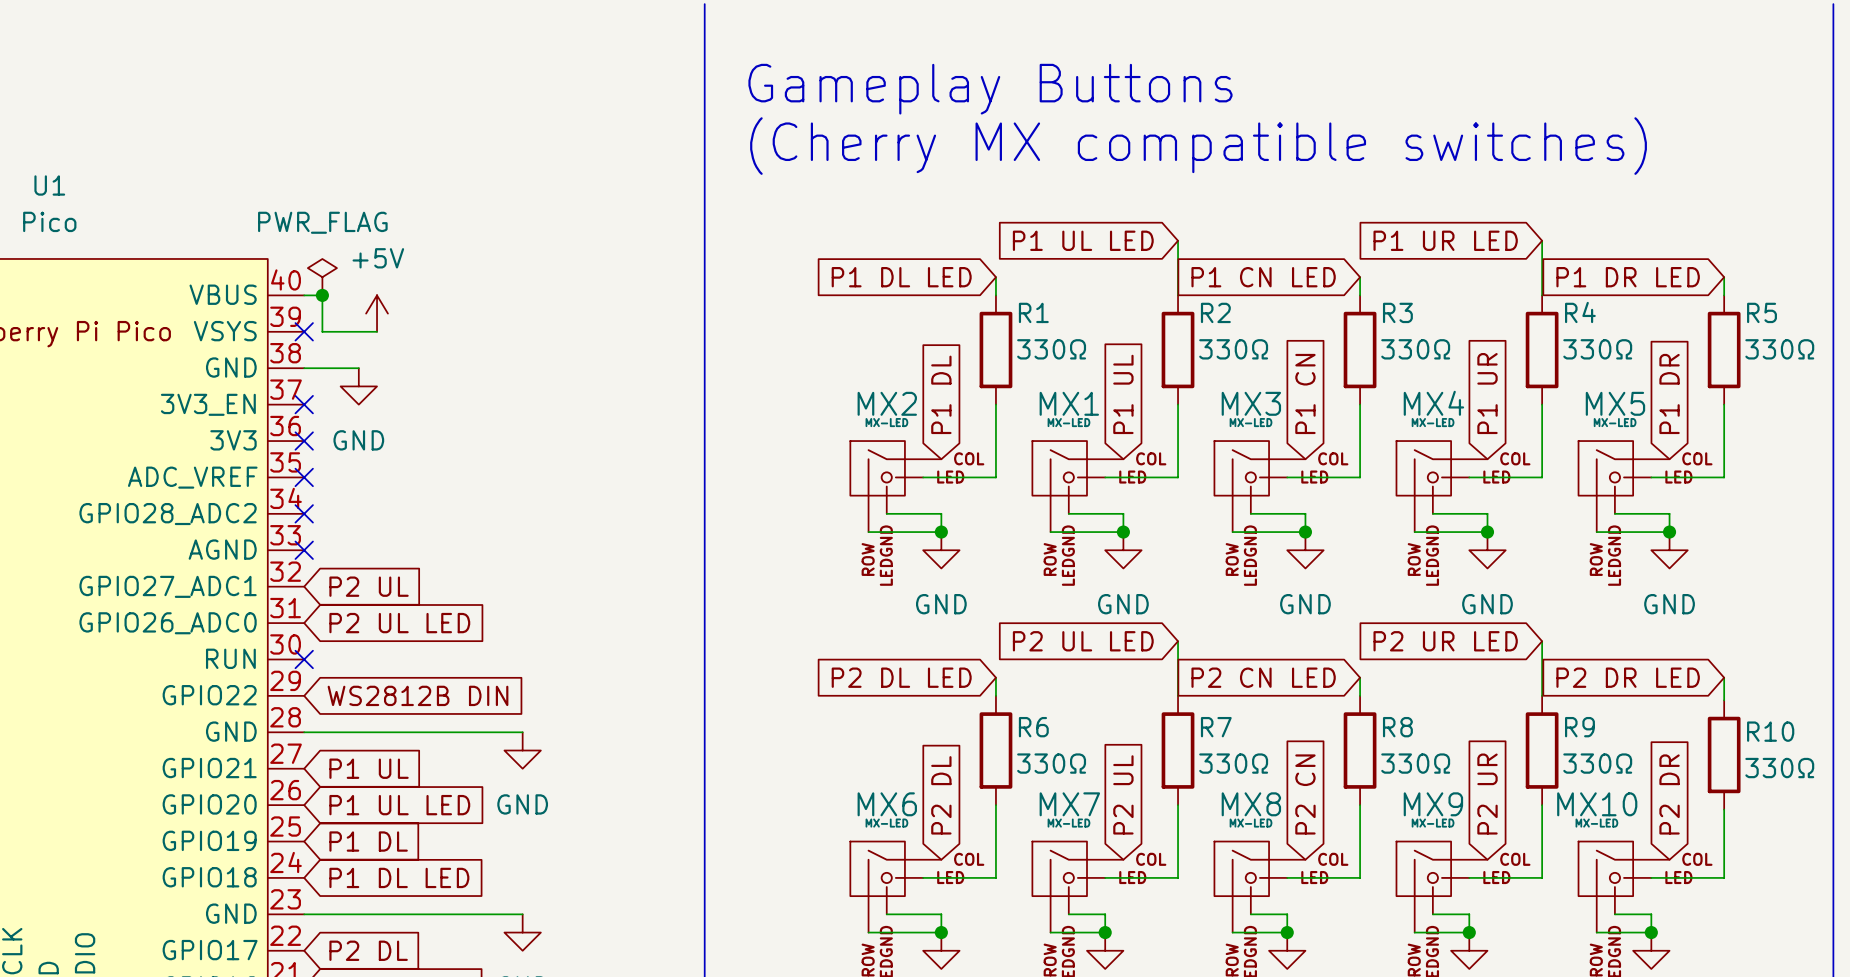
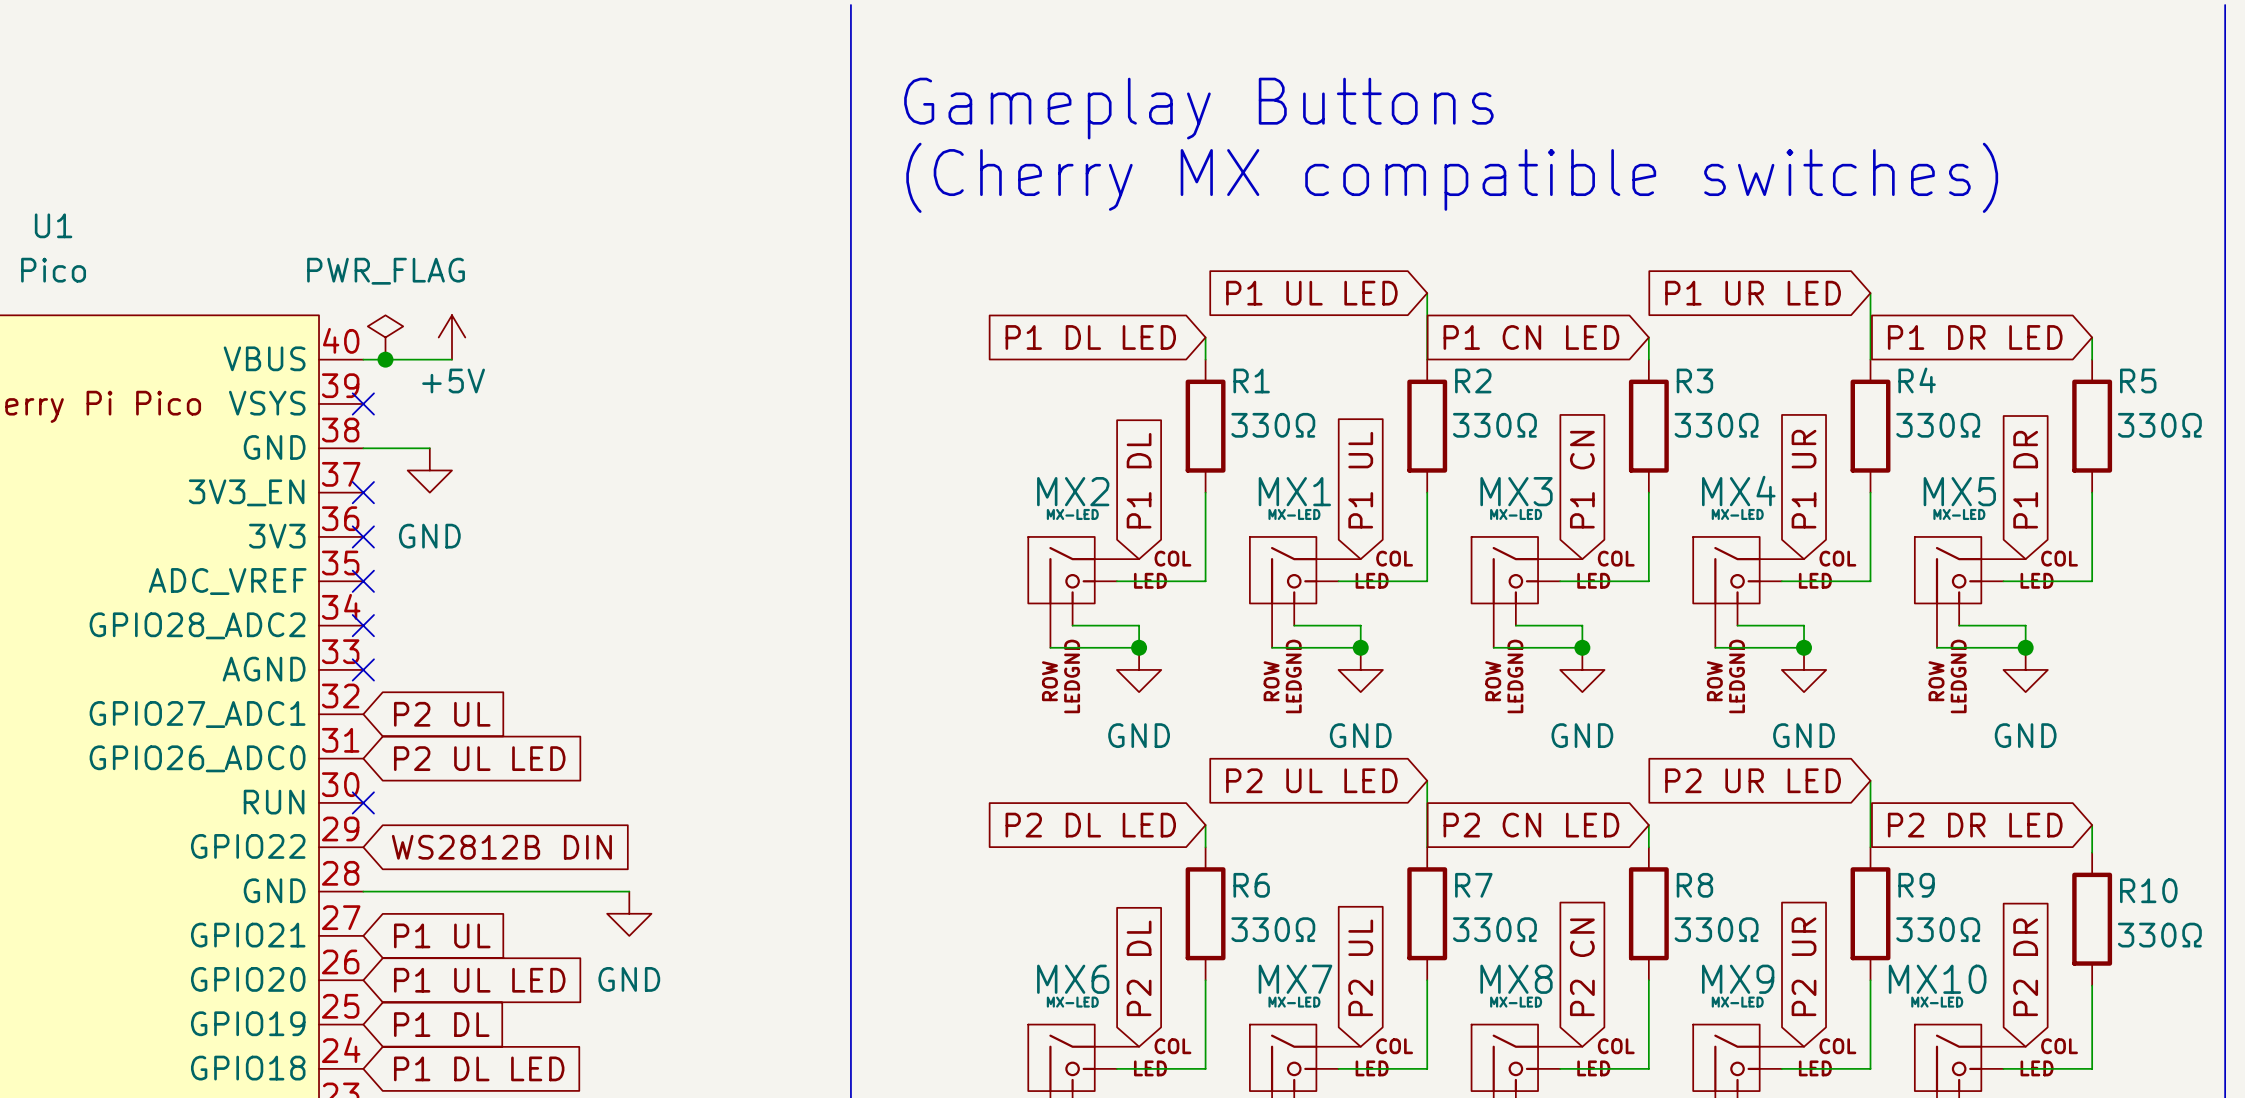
power symbol text position: +5V (378, 258) -> +5V (453, 380)
wire: (322, 295) (322, 331) (377, 331) -> (385, 359) (451, 359)
power symbol position: +5V (377, 313) -> +5V (451, 337)

